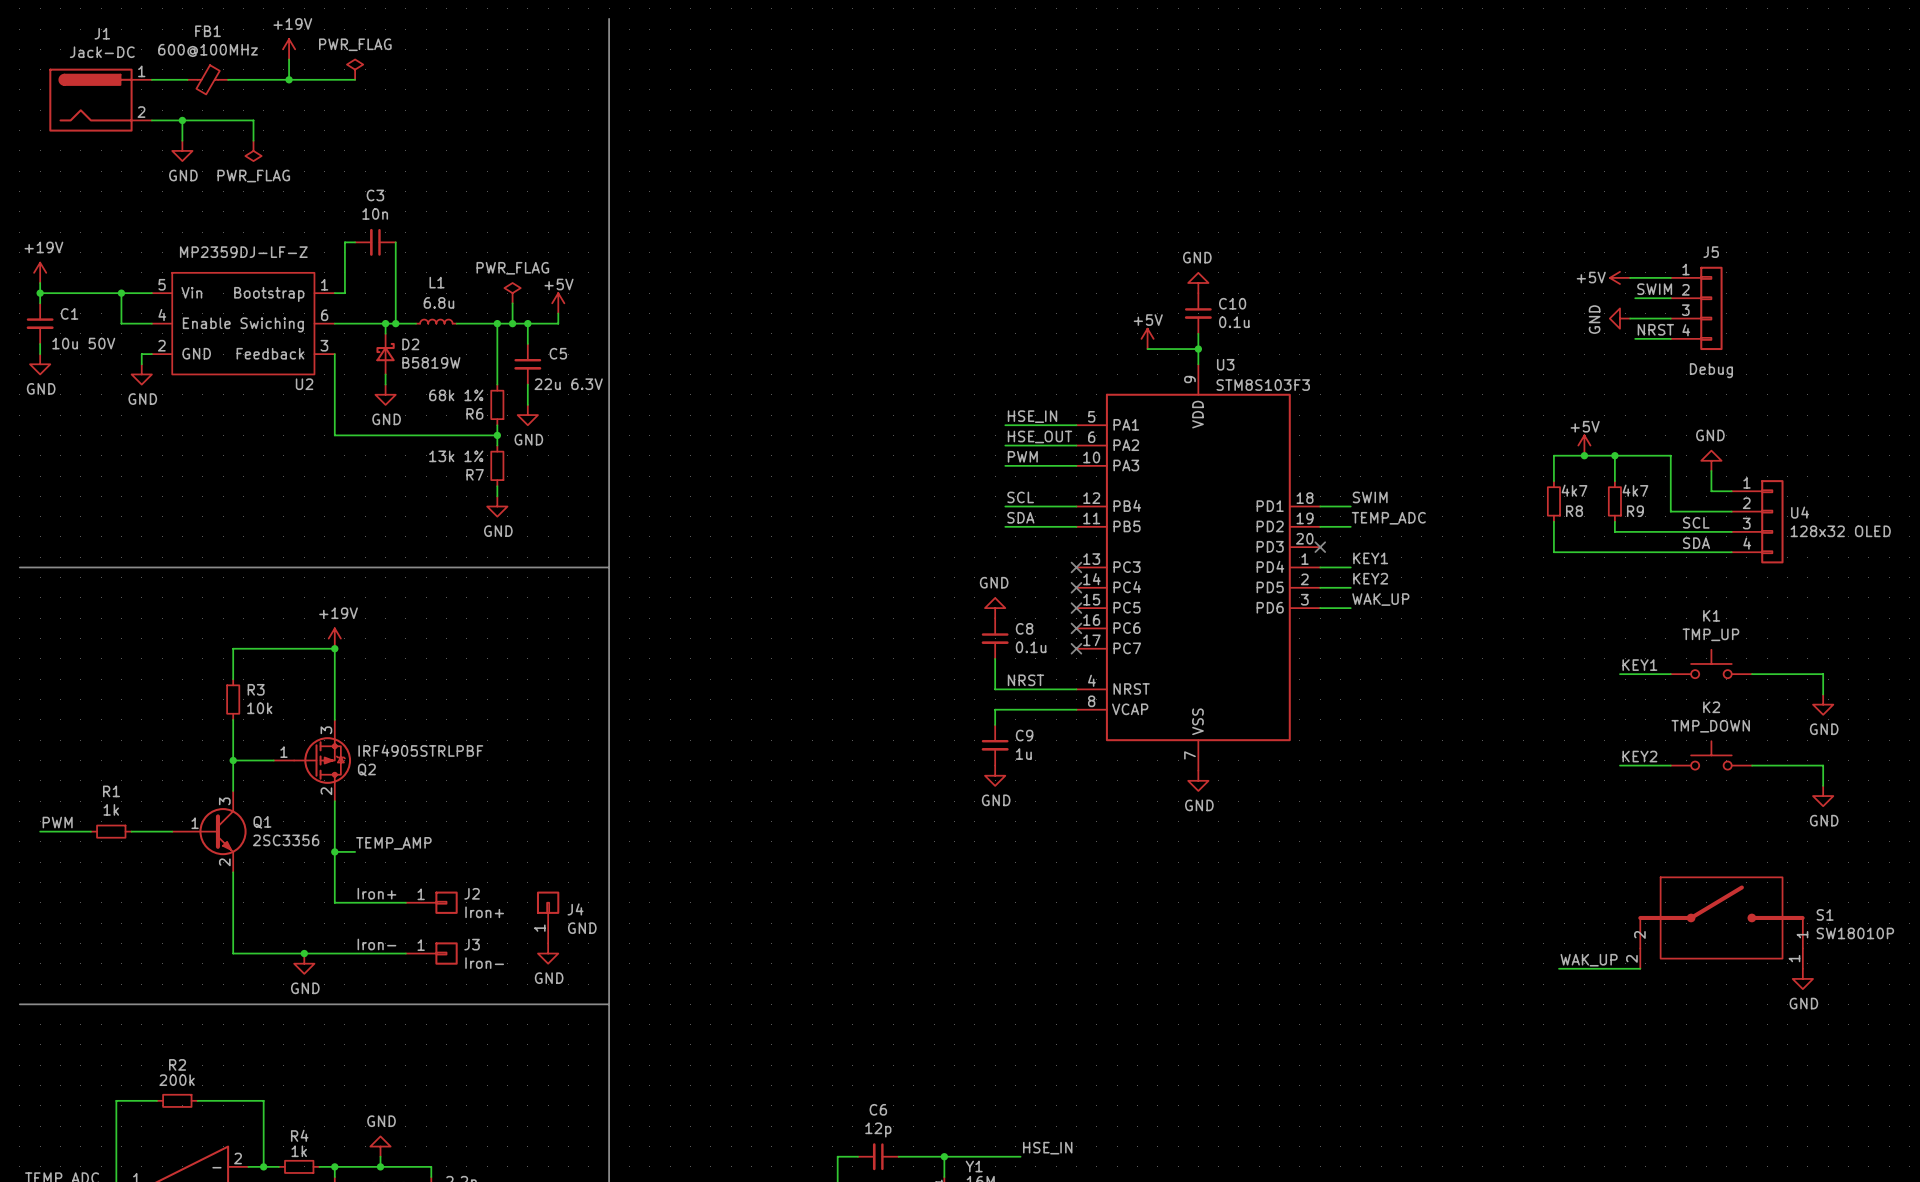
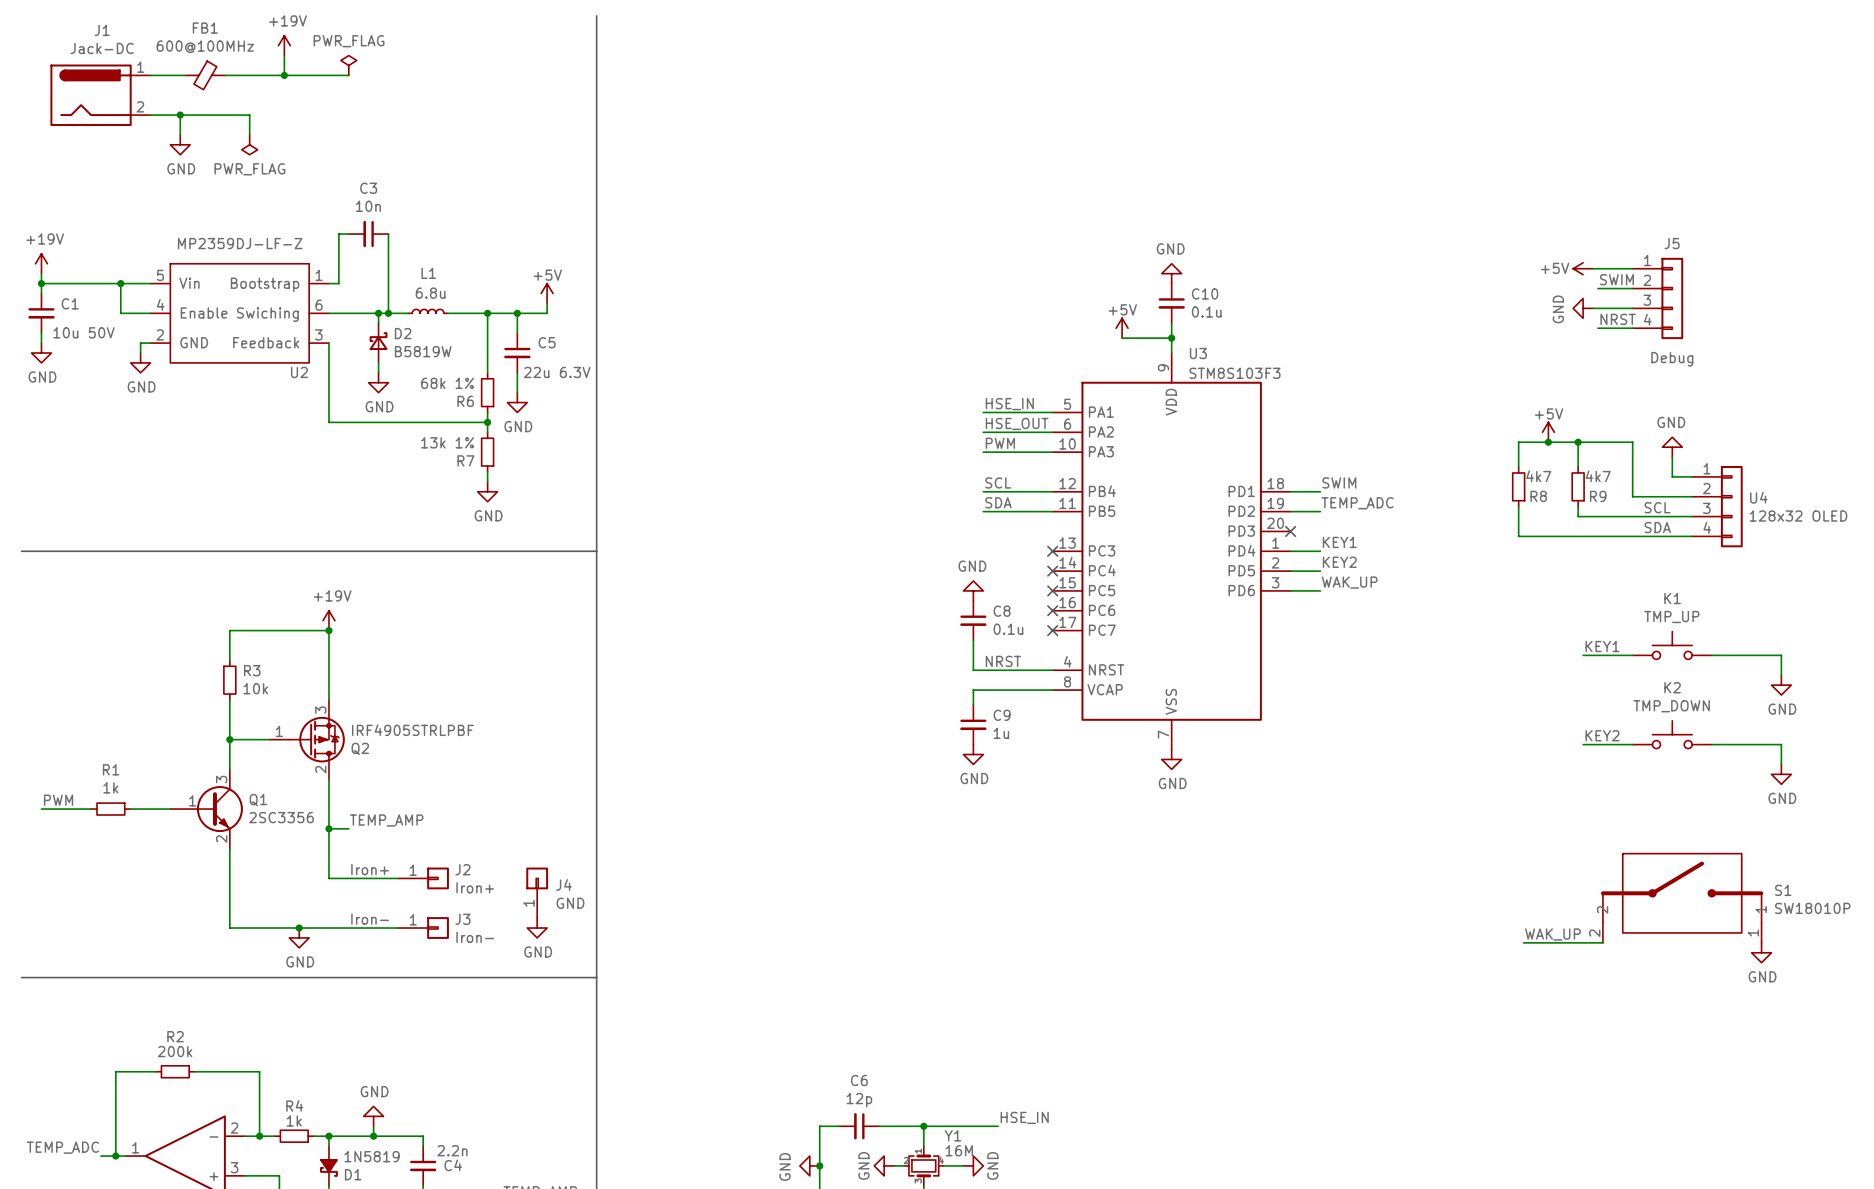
power symbol: PWR_FLAG (512, 293) -> none
wire: (512, 303) (512, 323) -> none
junction: (512, 323) -> none

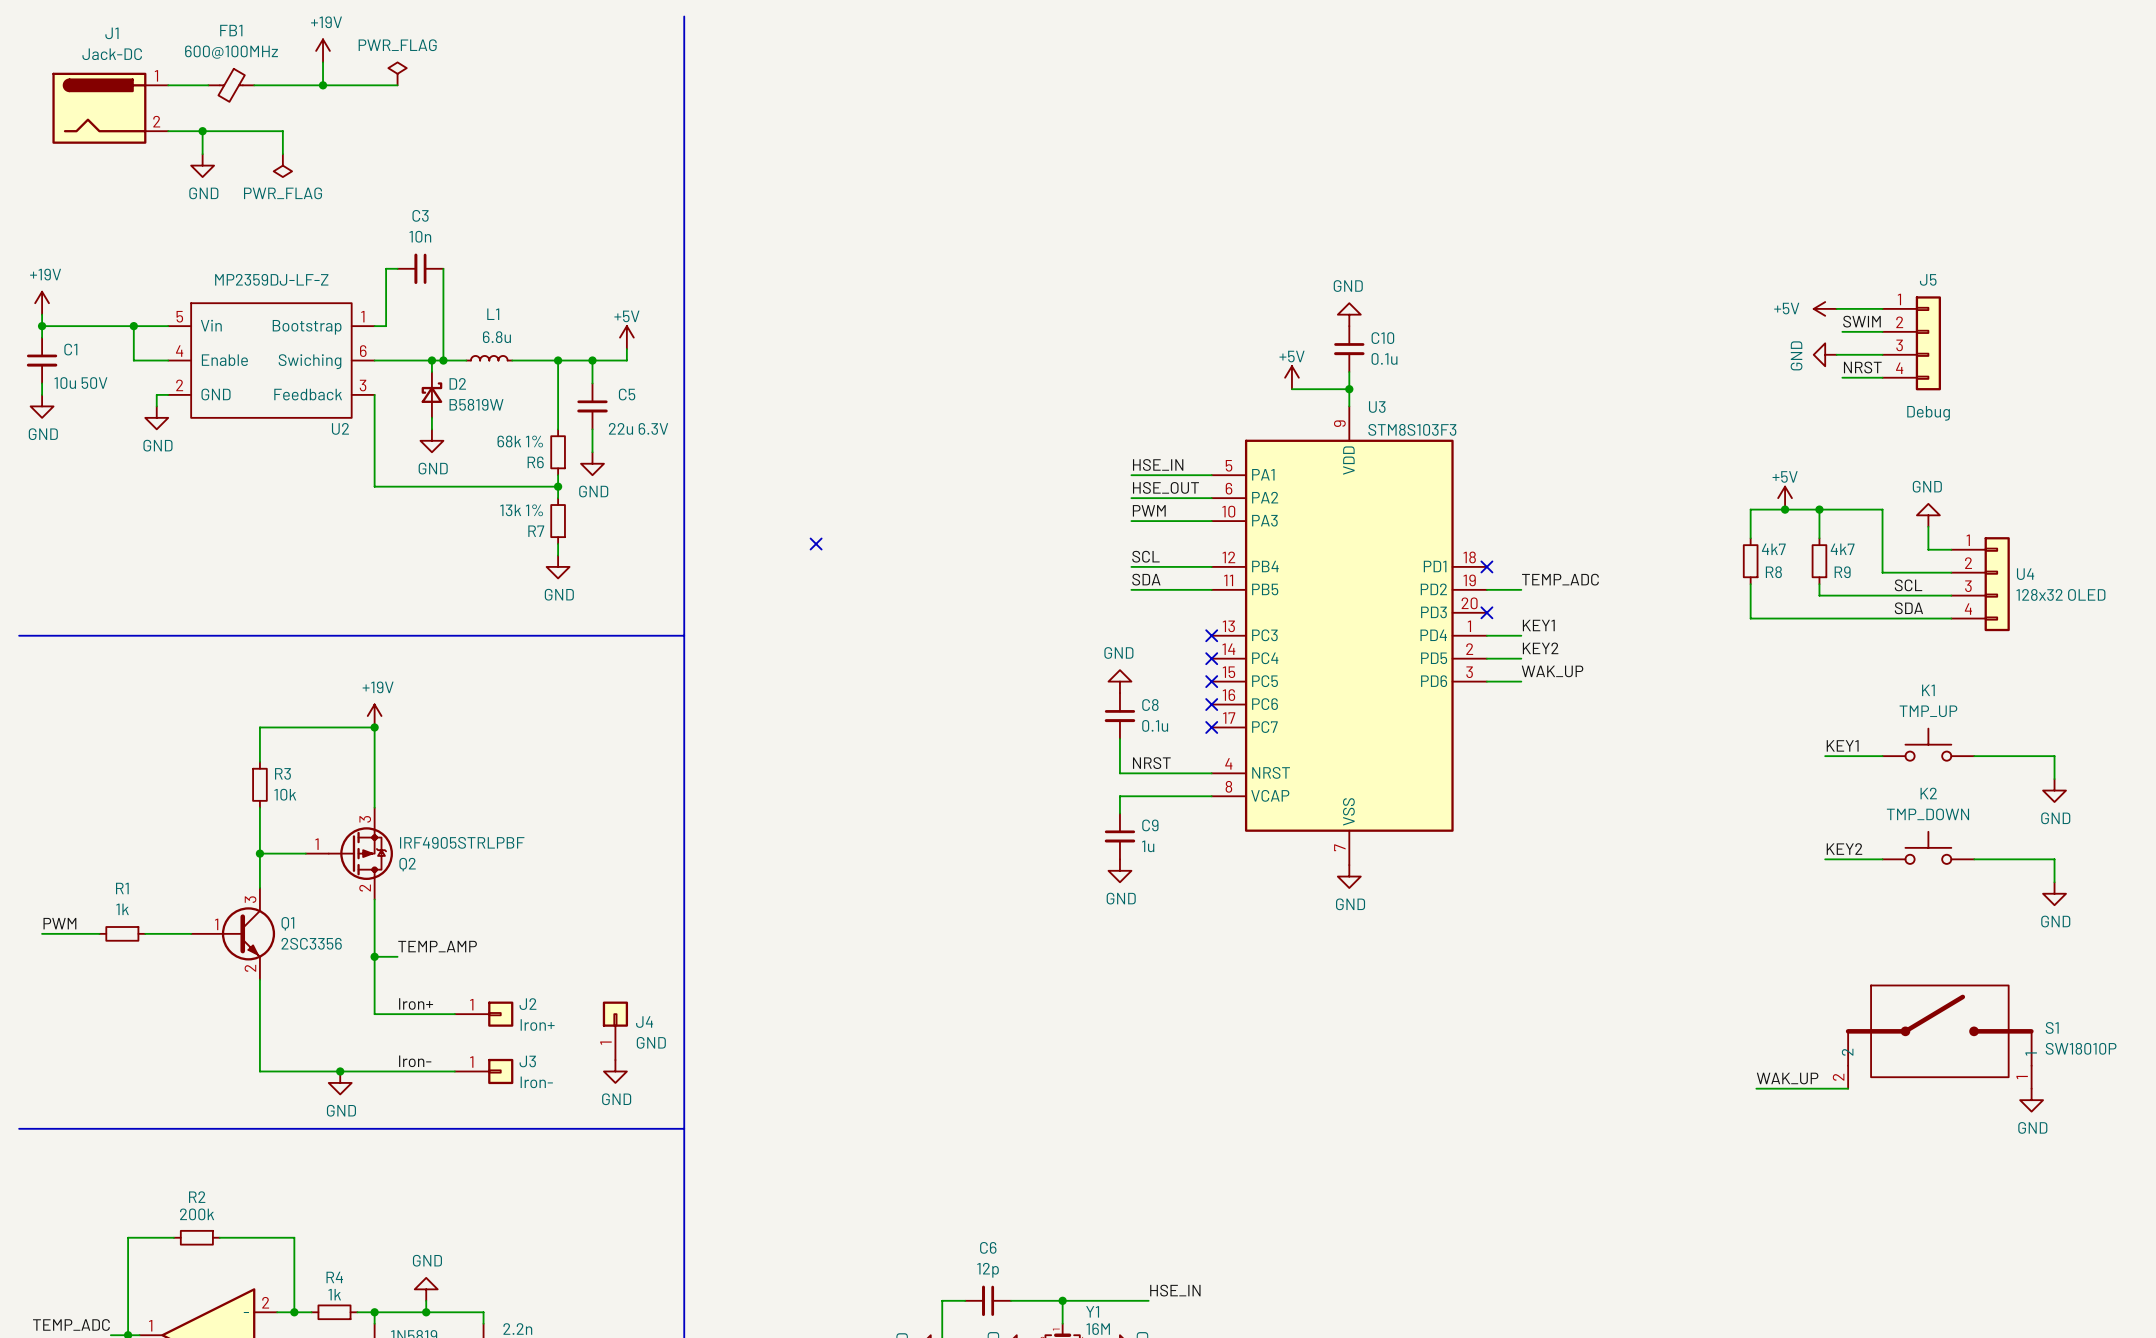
no-connect mark: none -> (816, 544)
label: SWIM (1339, 482) -> none
wire: (1290, 491) (1320, 491) -> none
no-connect mark: none -> (1486, 566)

